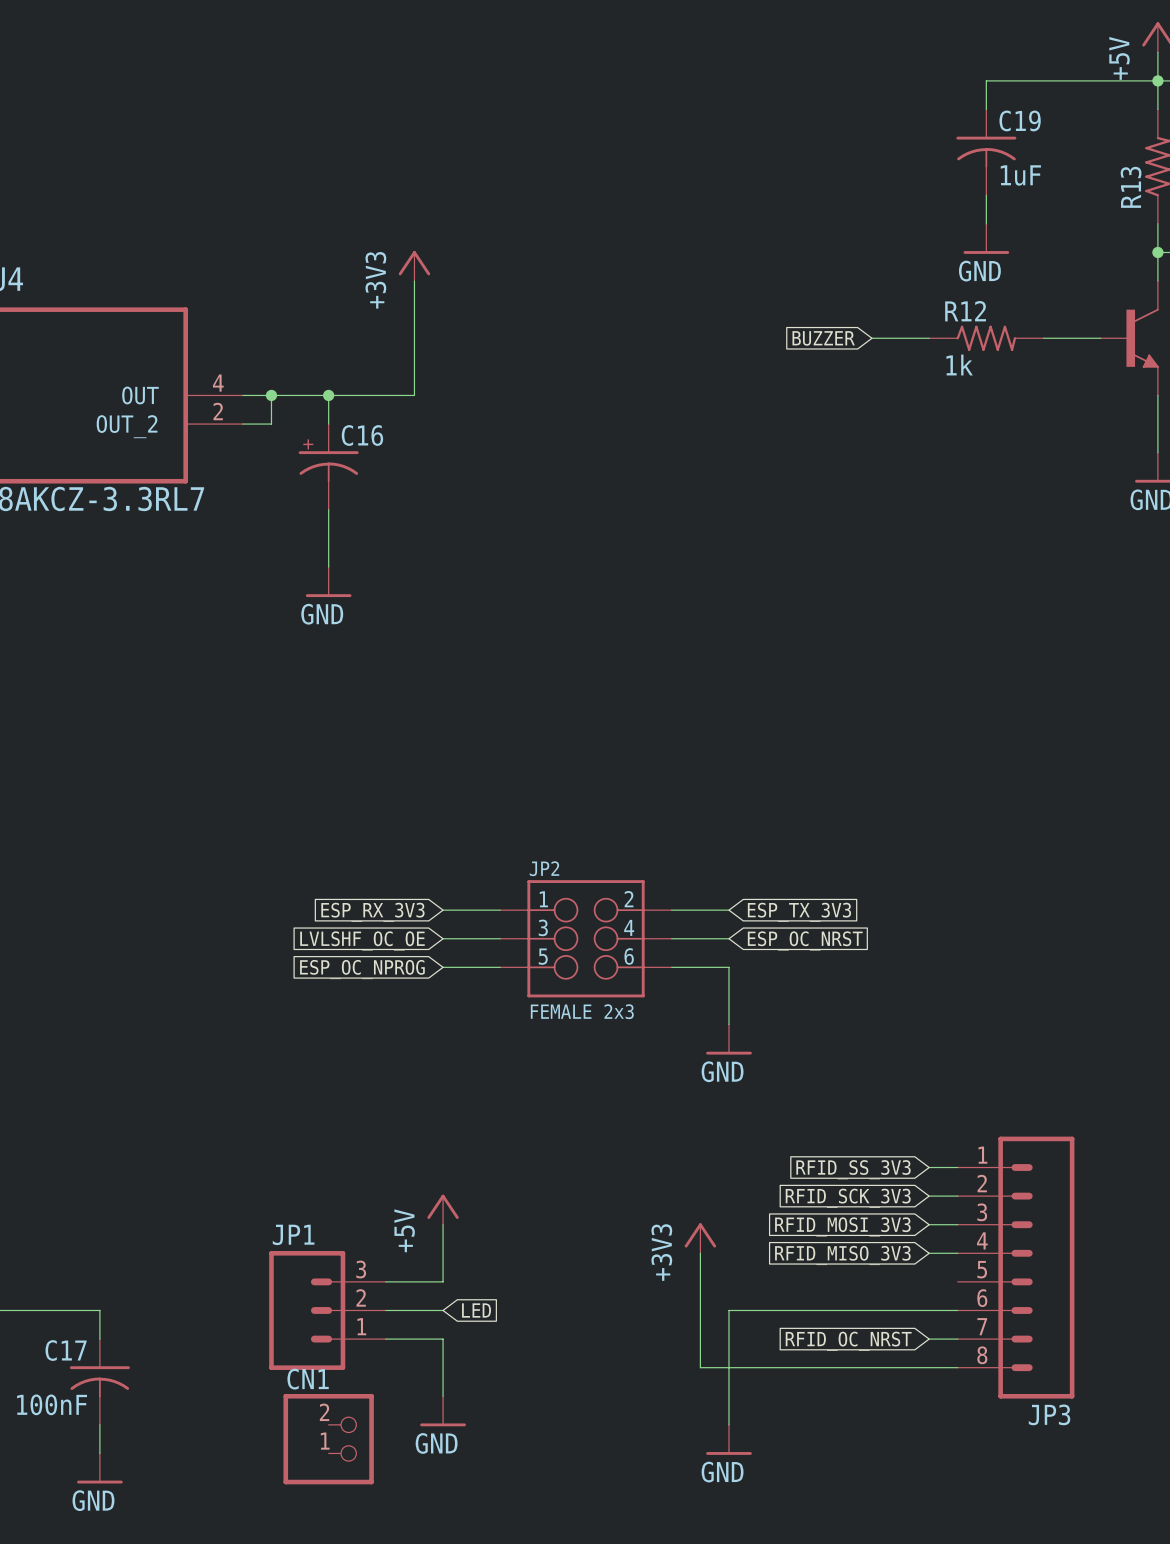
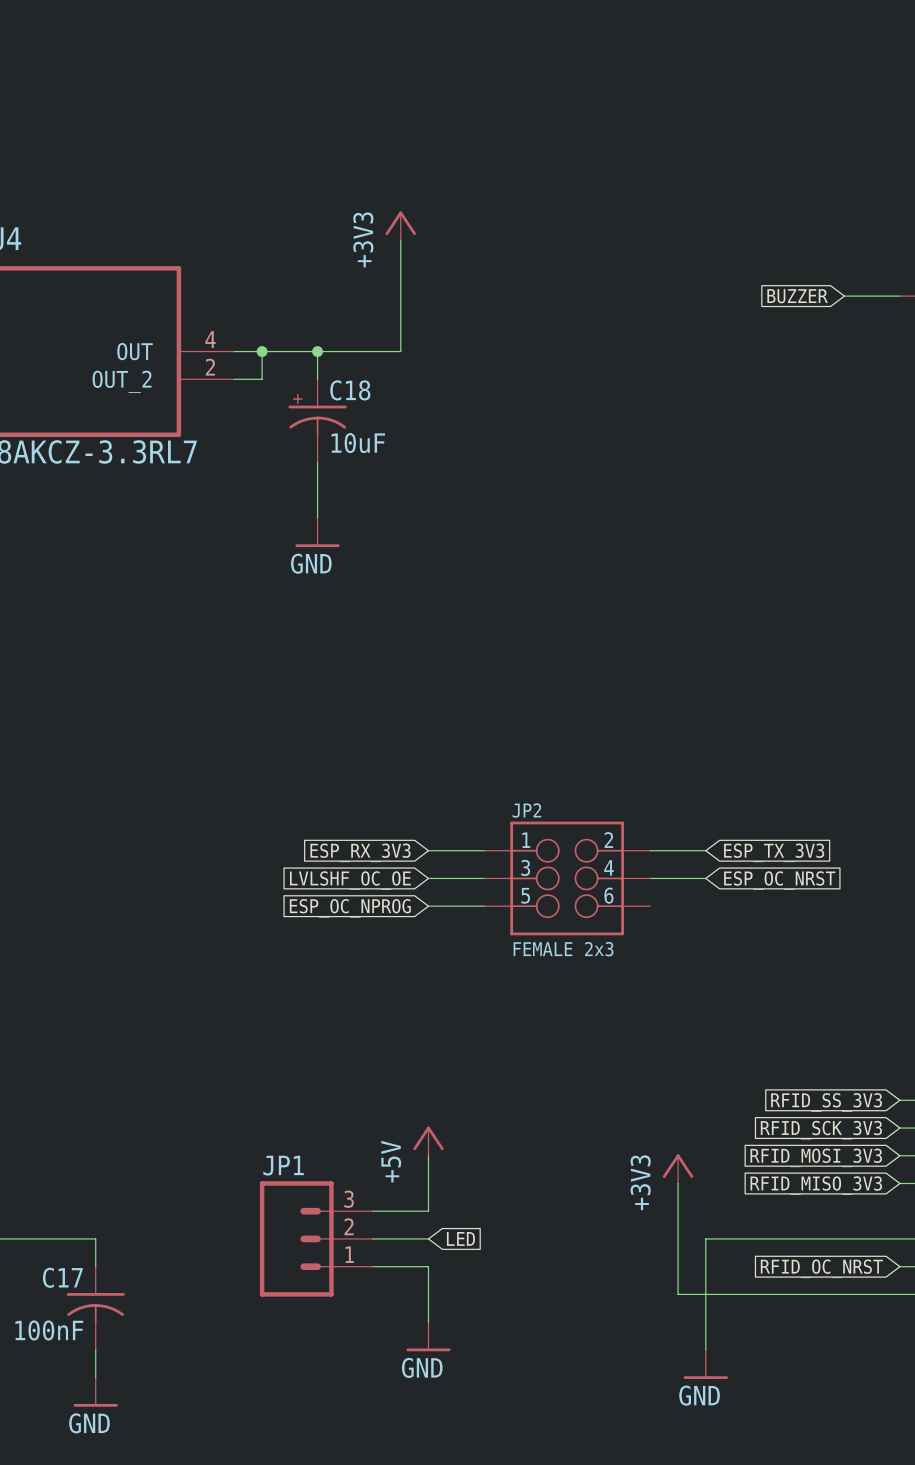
C16 name: C16 (362, 435) -> C18 (350, 390)
C16 value: none -> 10uF (358, 443)
wire: (671, 967) (728, 967) (728, 1024) -> none
power symbol: GND (728, 1039) -> none
CN1: (328, 1439) -> none

